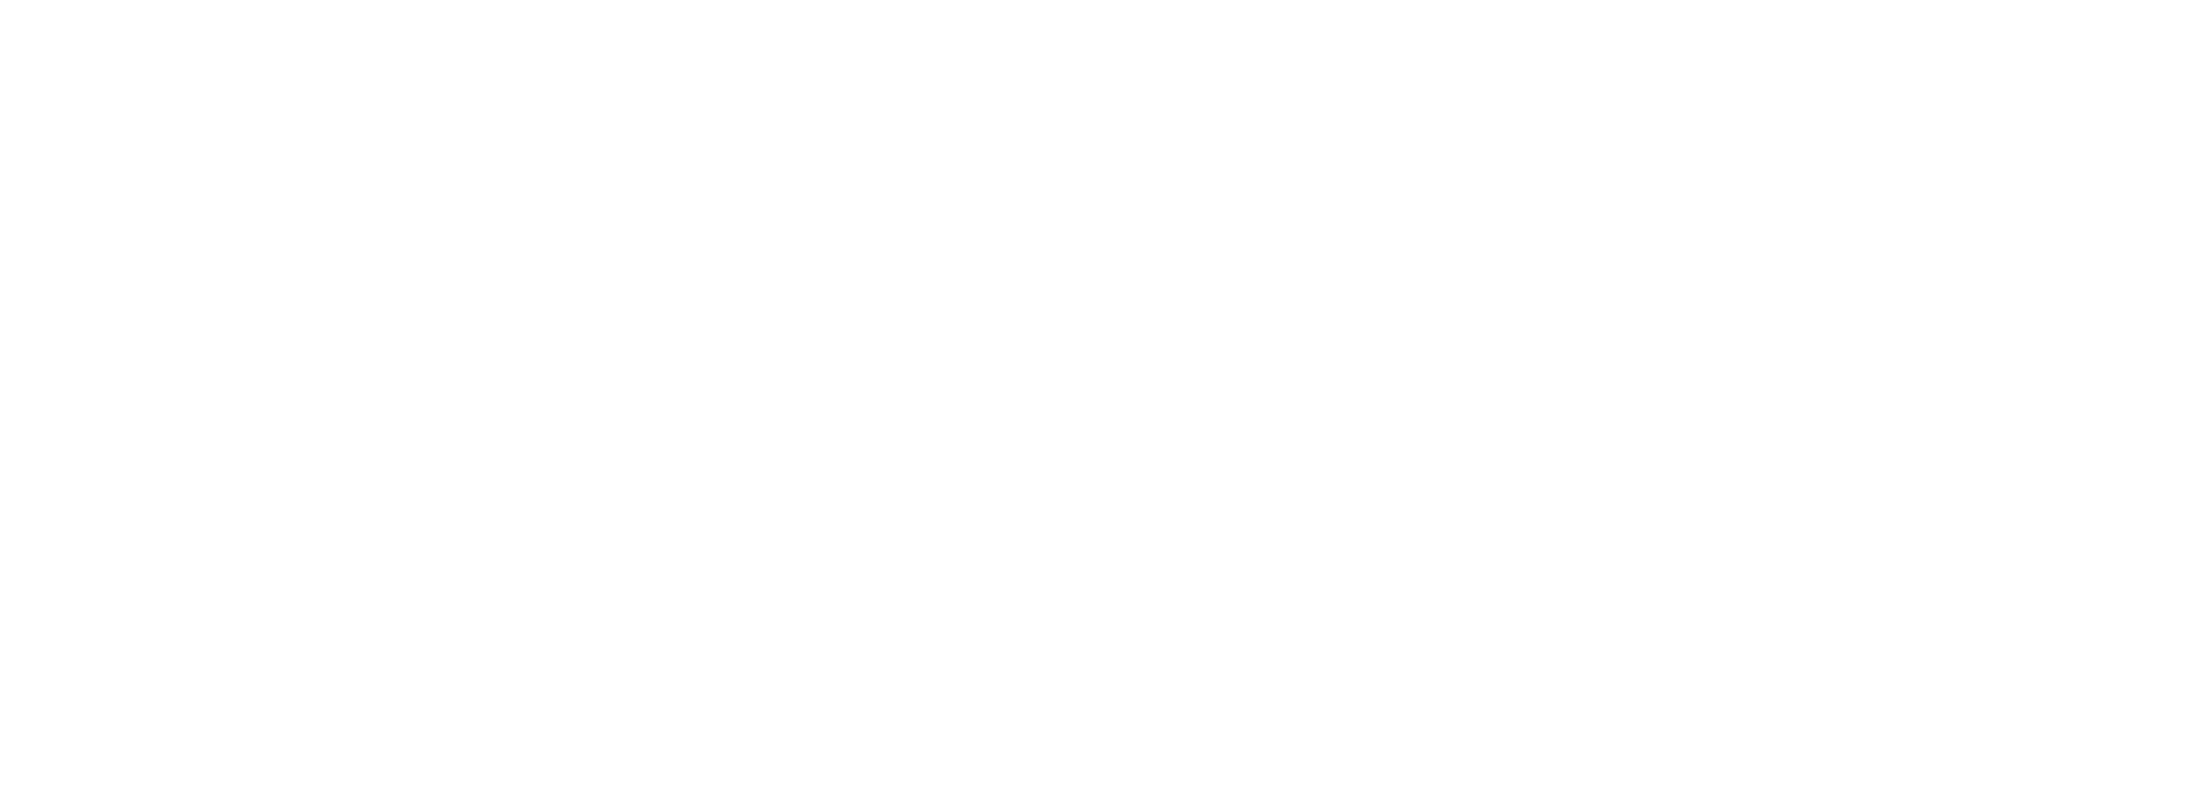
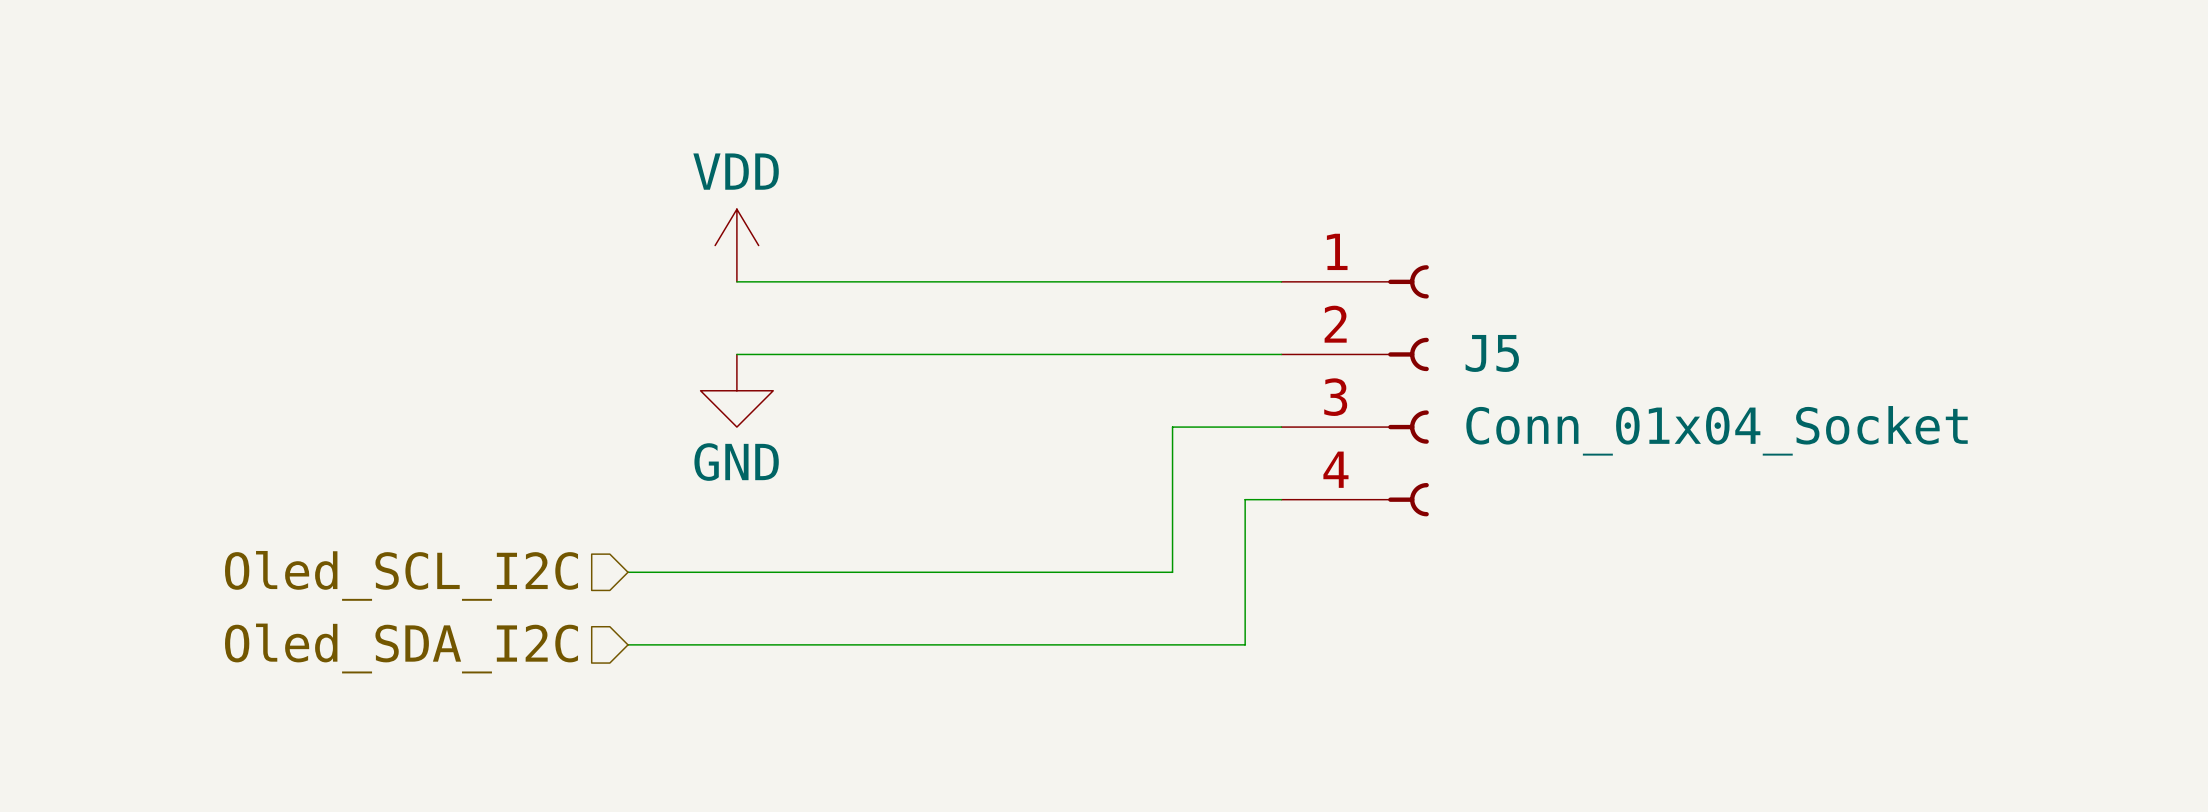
power symbol: none -> VDD (736, 245)
wire: none -> (736, 281) (1281, 281)
wire: none -> (736, 354) (1281, 354)
power symbol: none -> GND (736, 390)
J5: none -> Conn_01x04_Socket (1355, 390)
wire: none -> (1281, 427) (1172, 427) (1172, 572) (628, 572)
wire: none -> (1281, 499) (1245, 499) (1245, 644) (628, 644)
hierarchical label: none -> Oled_SCL_I2C (401, 575)
hierarchical label: none -> Oled_SDA_I2C (401, 648)

